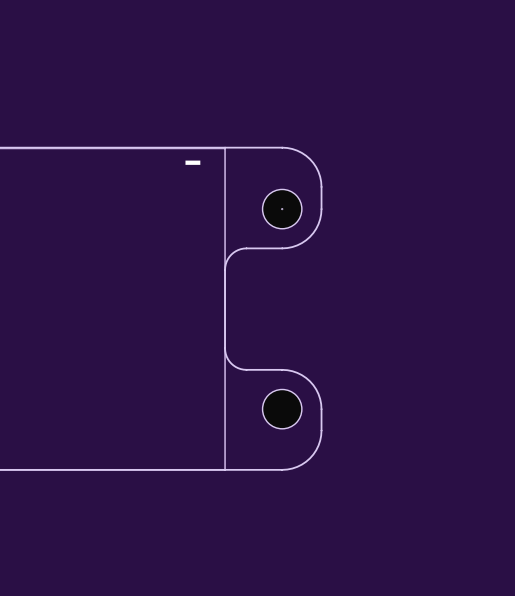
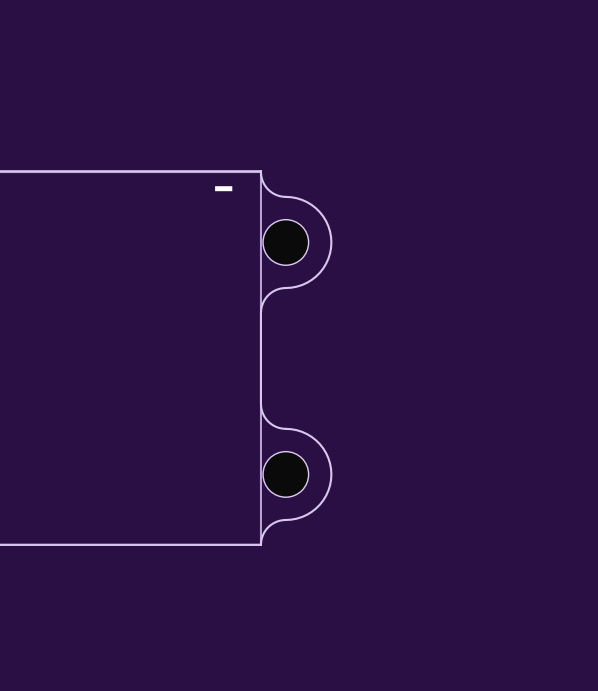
board edge: (225, 147) (292, 148) (310, 159) (320, 176) (321, 214) (318, 224) (310, 236) (297, 245) (287, 248) (246, 248) -> (260, 172) (262, 181) (270, 191) (279, 196) (301, 199) (311, 204) (323, 216) (330, 231) (330, 253) (323, 268) (306, 282) (285, 288)
round board edge: [281, 208, 283, 210] -> none
part position: (282, 209) -> (285, 242)
board edge: (246, 369) (287, 370) (297, 372) (310, 381) (318, 394) (321, 404) (320, 440) (310, 458) (292, 468) (225, 469) -> (285, 428) (306, 434) (323, 448) (330, 463) (330, 485) (323, 500) (311, 511) (301, 517) (279, 520) (270, 525) (262, 535) (260, 544)
part position: (282, 409) -> (285, 474)

